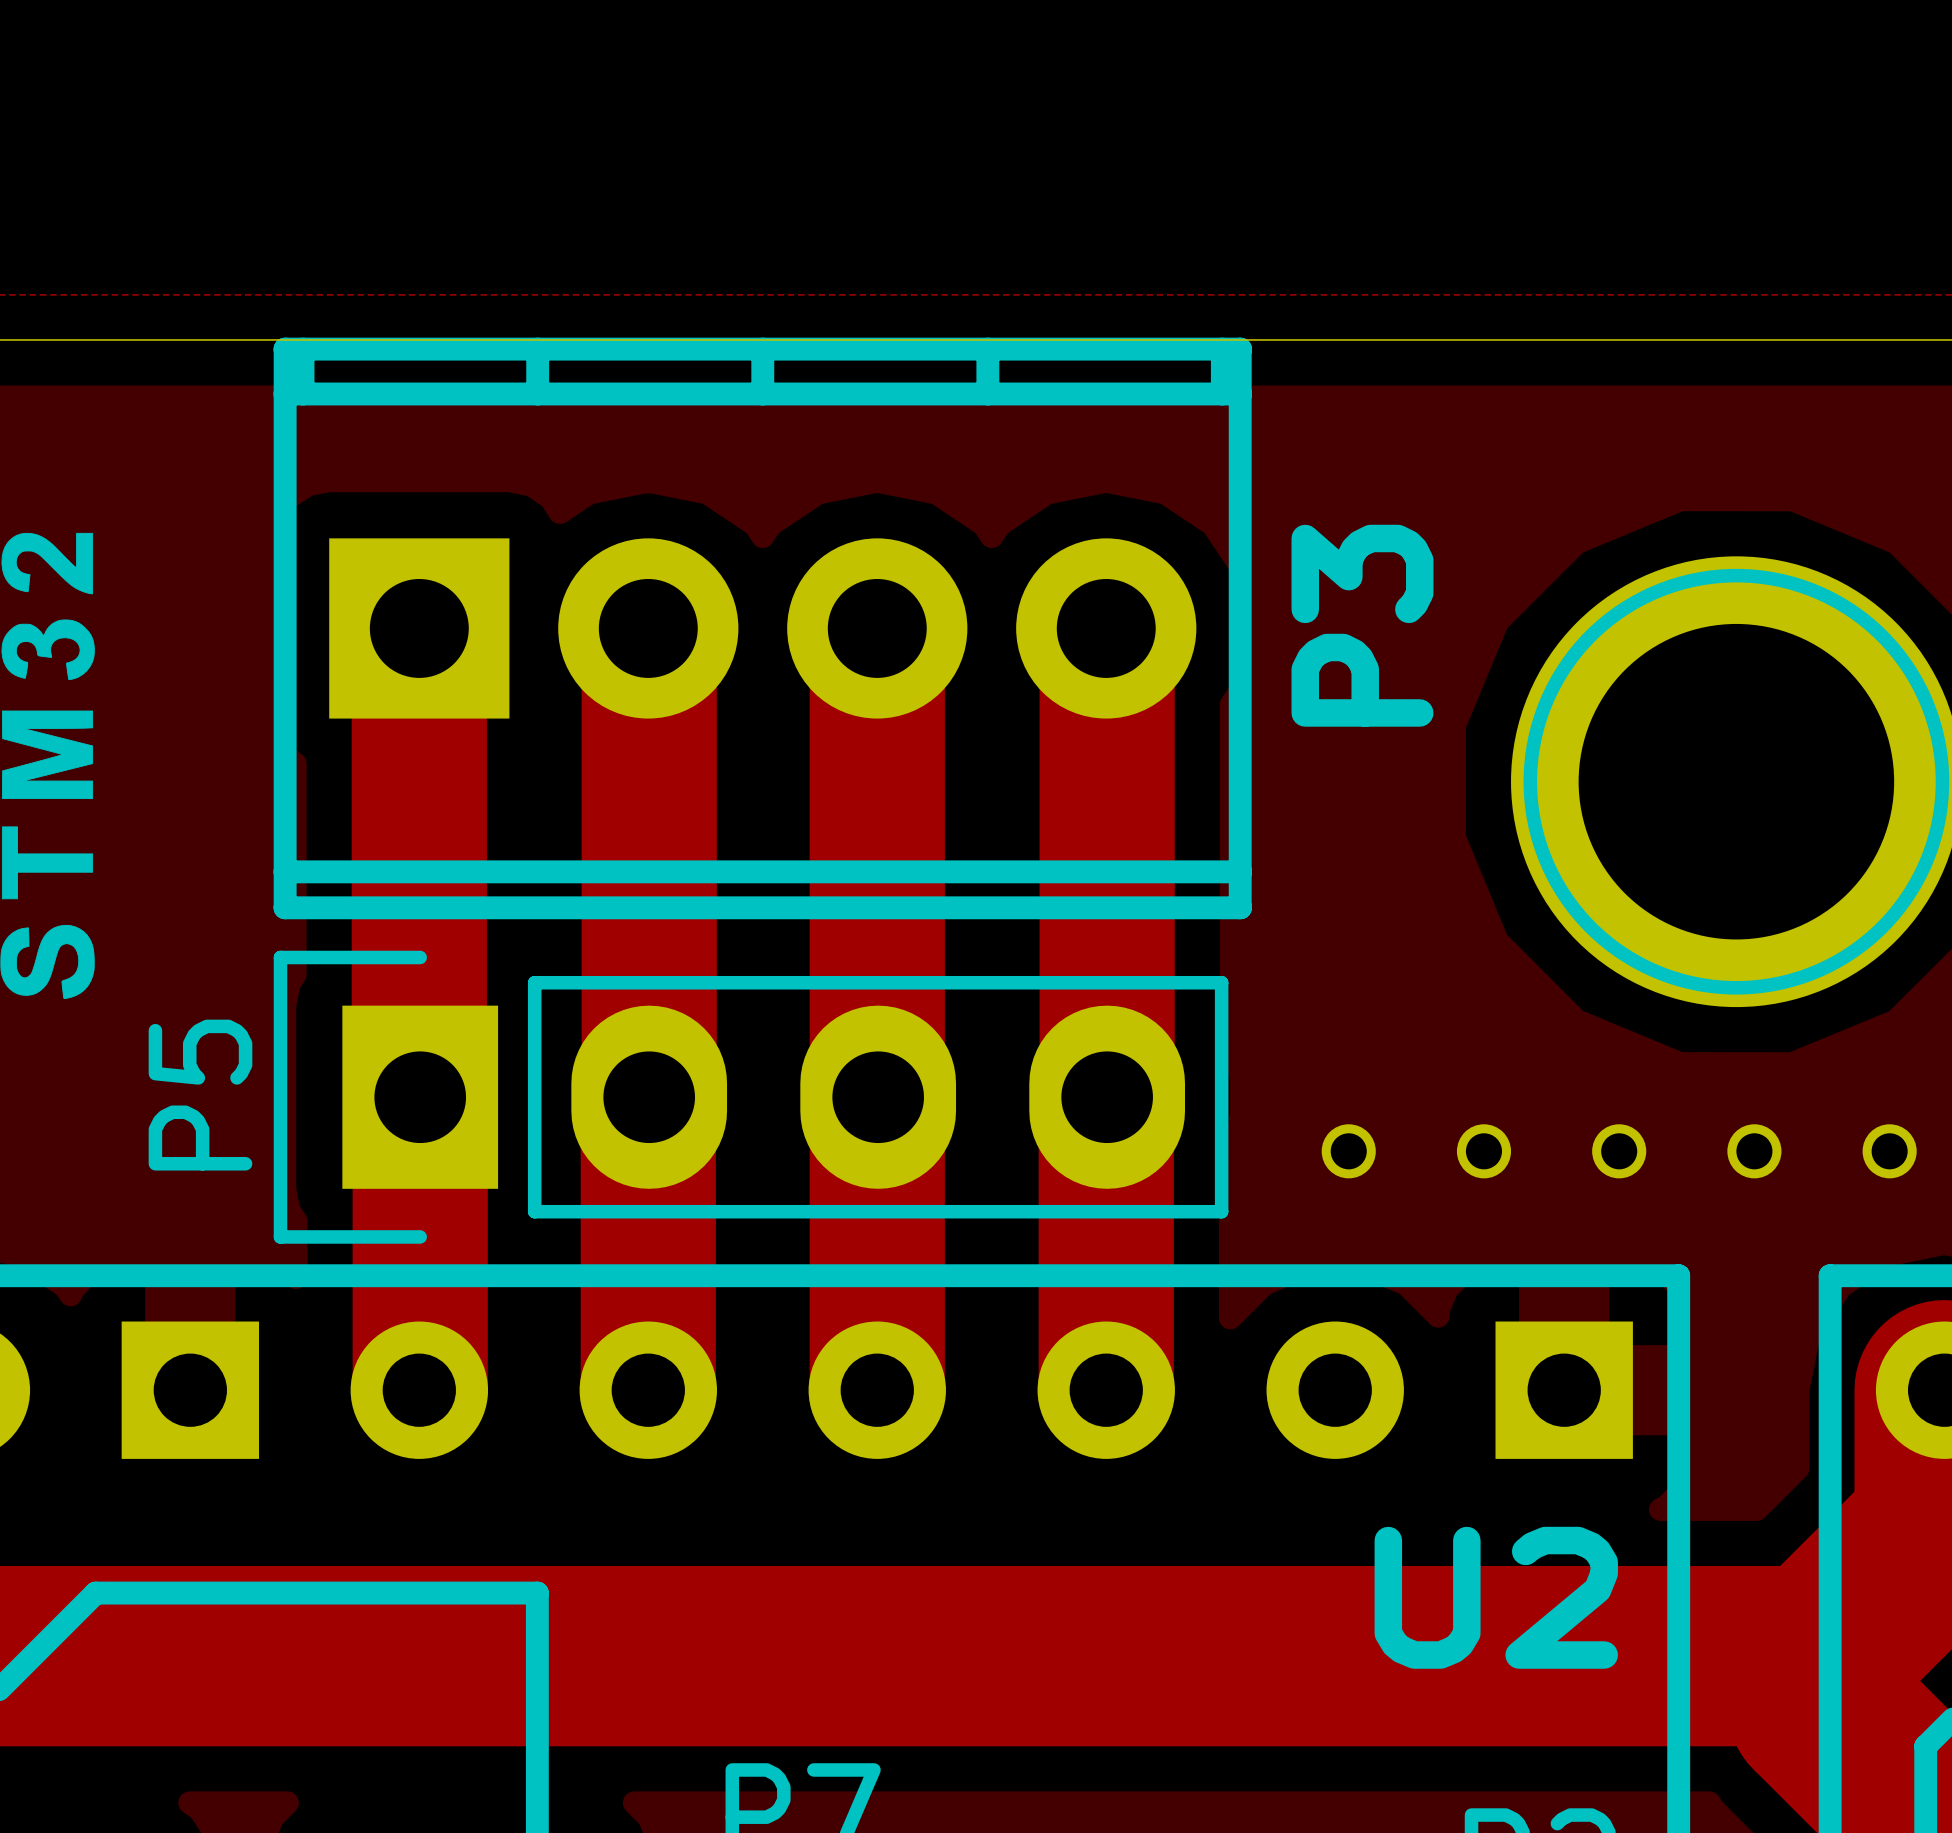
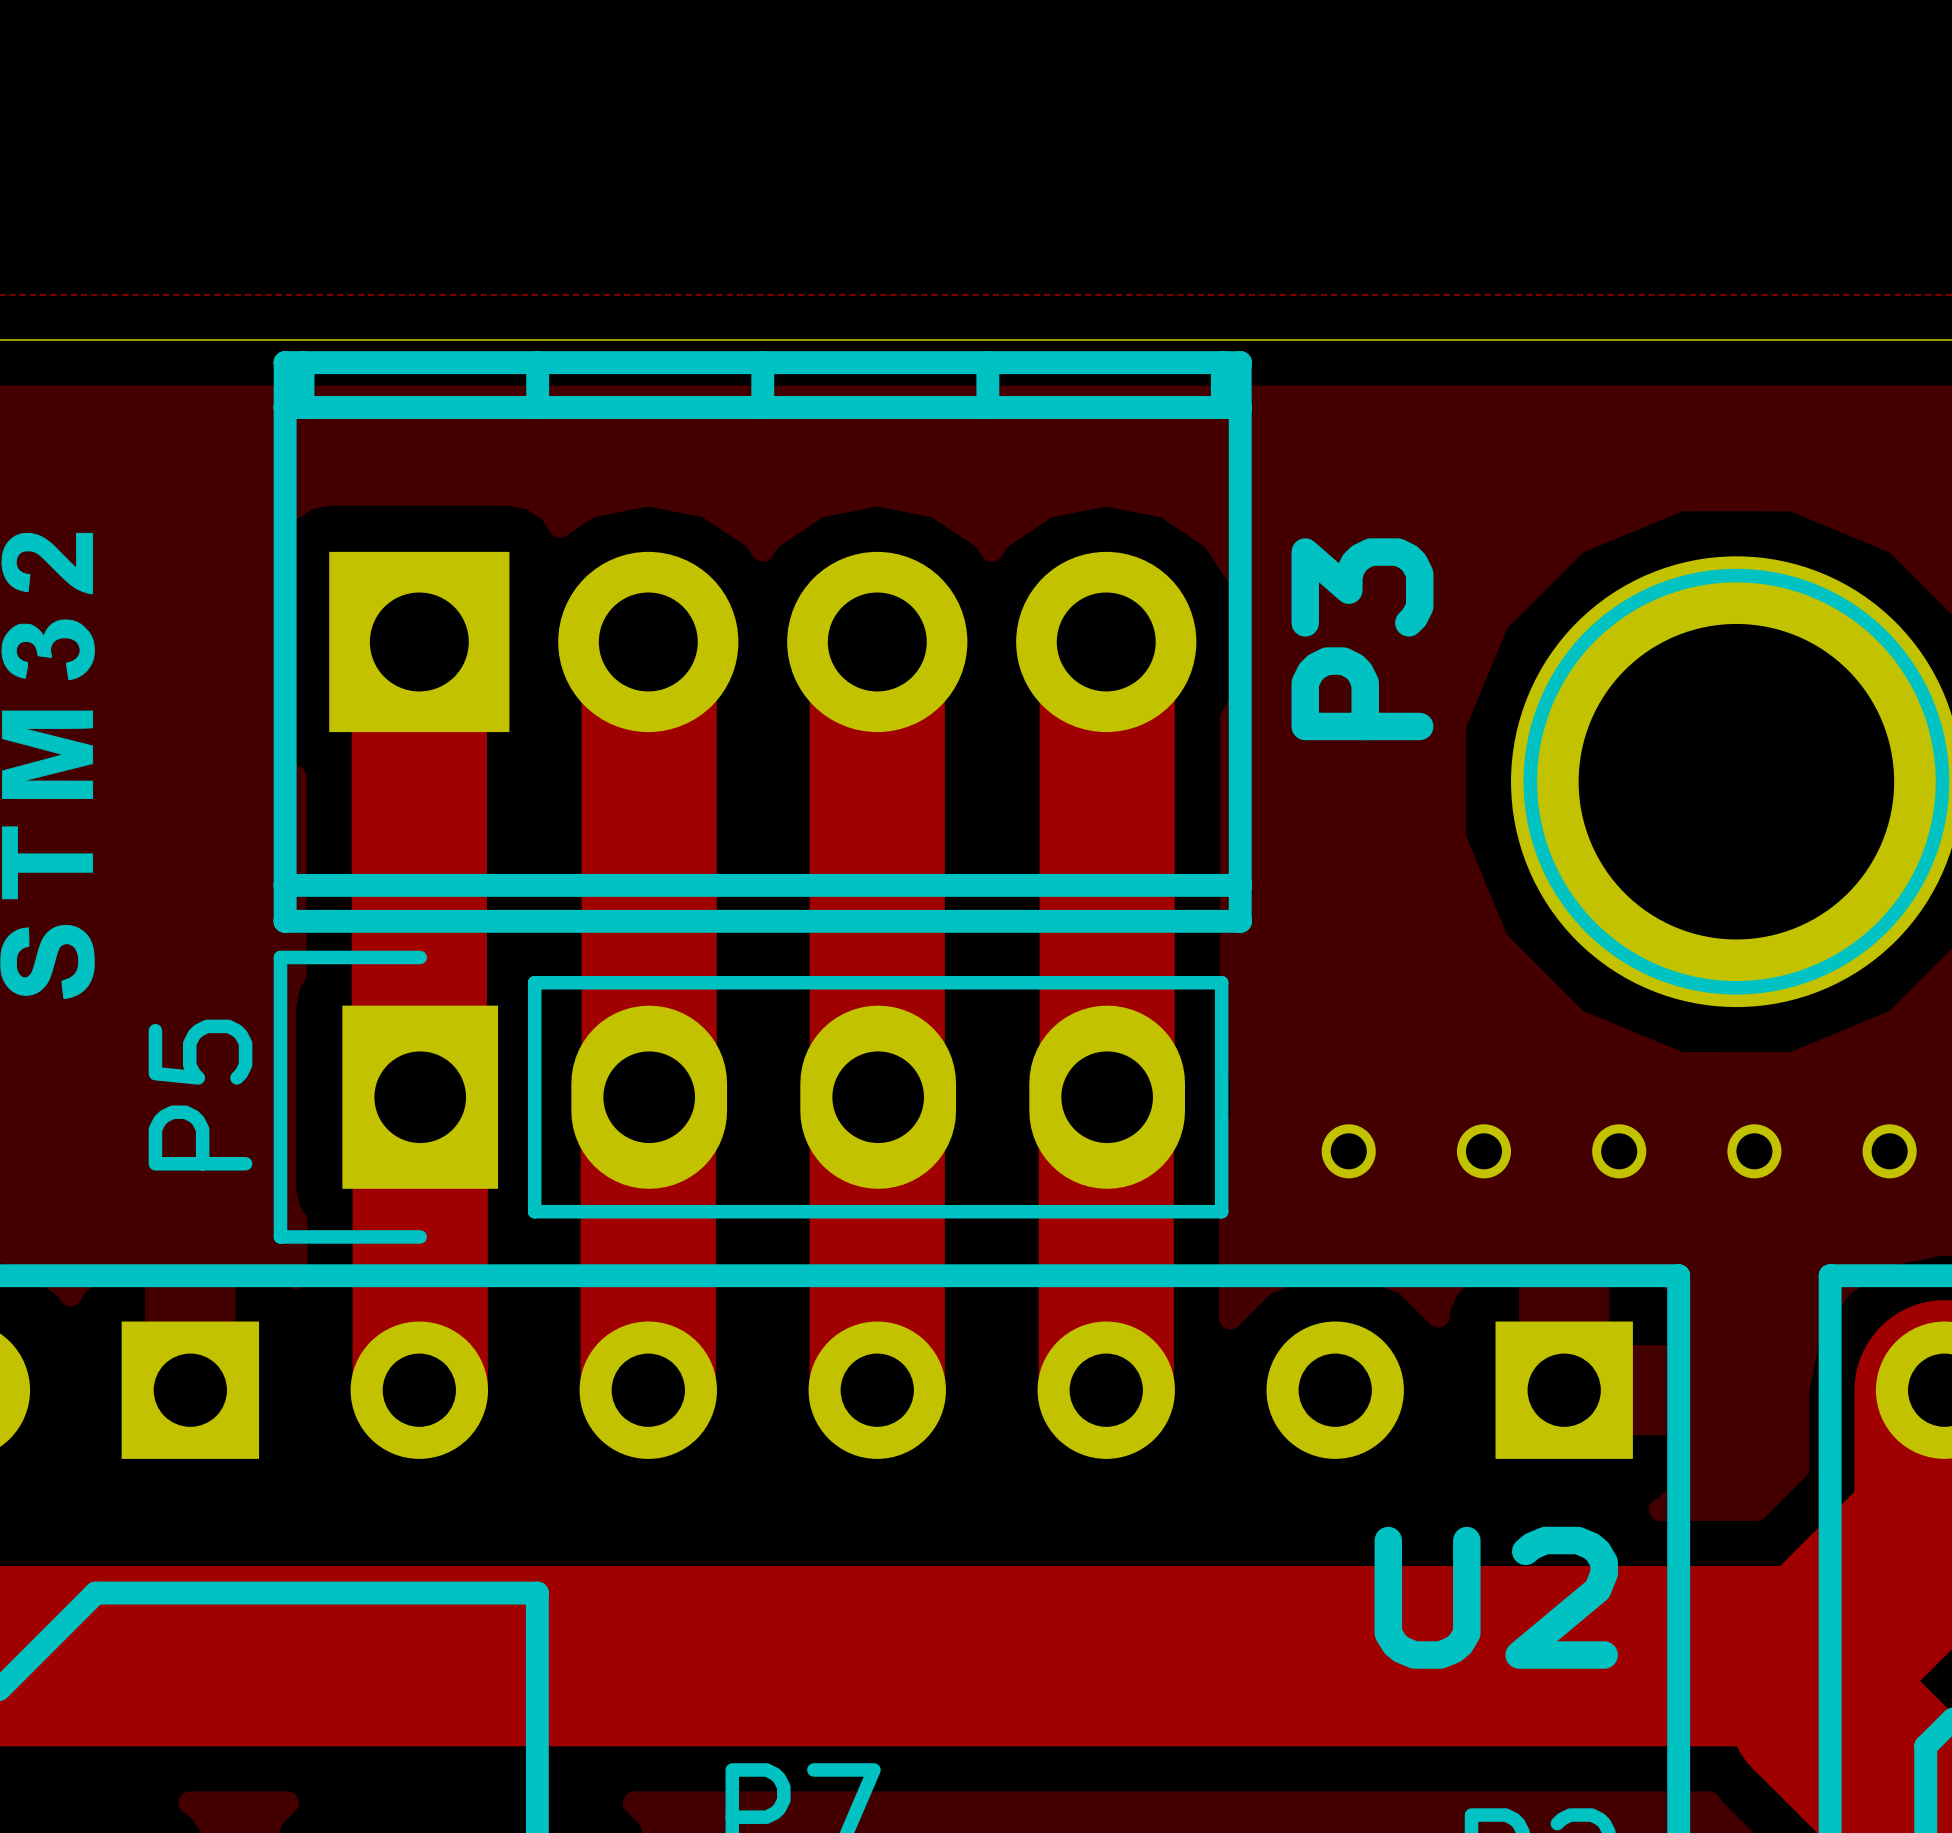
P3 position: (762, 628) -> (762, 641)

